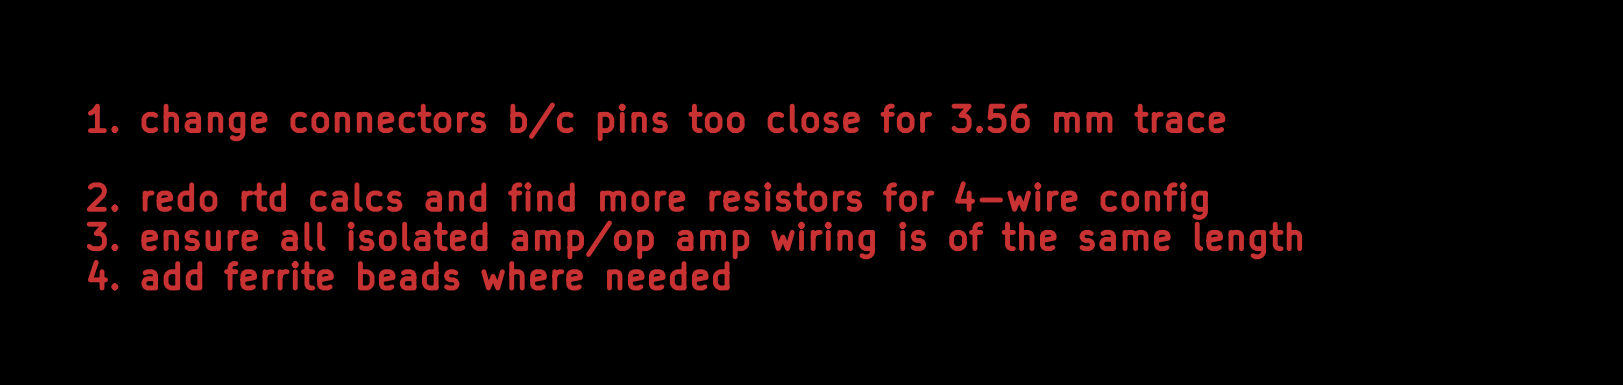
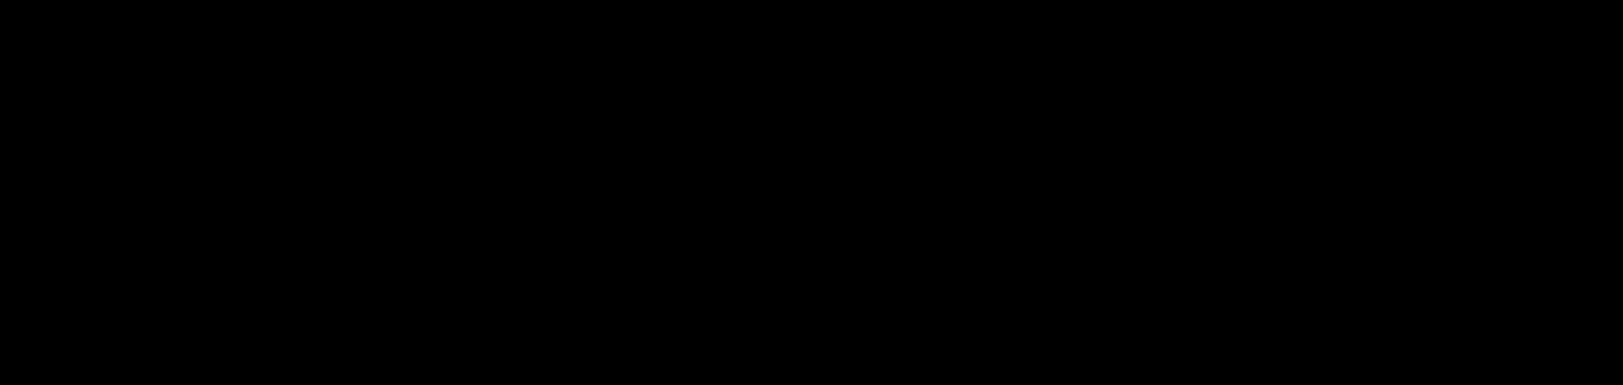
text: 1. change connectors b/c pins too close for 3.56 mm trace (656, 121) -> none
text: 2. redo rtd calcs and find more resistors for 4-wire config (647, 200) -> none
text: 3. ensure all isolated amp/op amp wiring is of the same length (694, 239) -> none
text: 4. add ferrite beads where needed (408, 275) -> none

